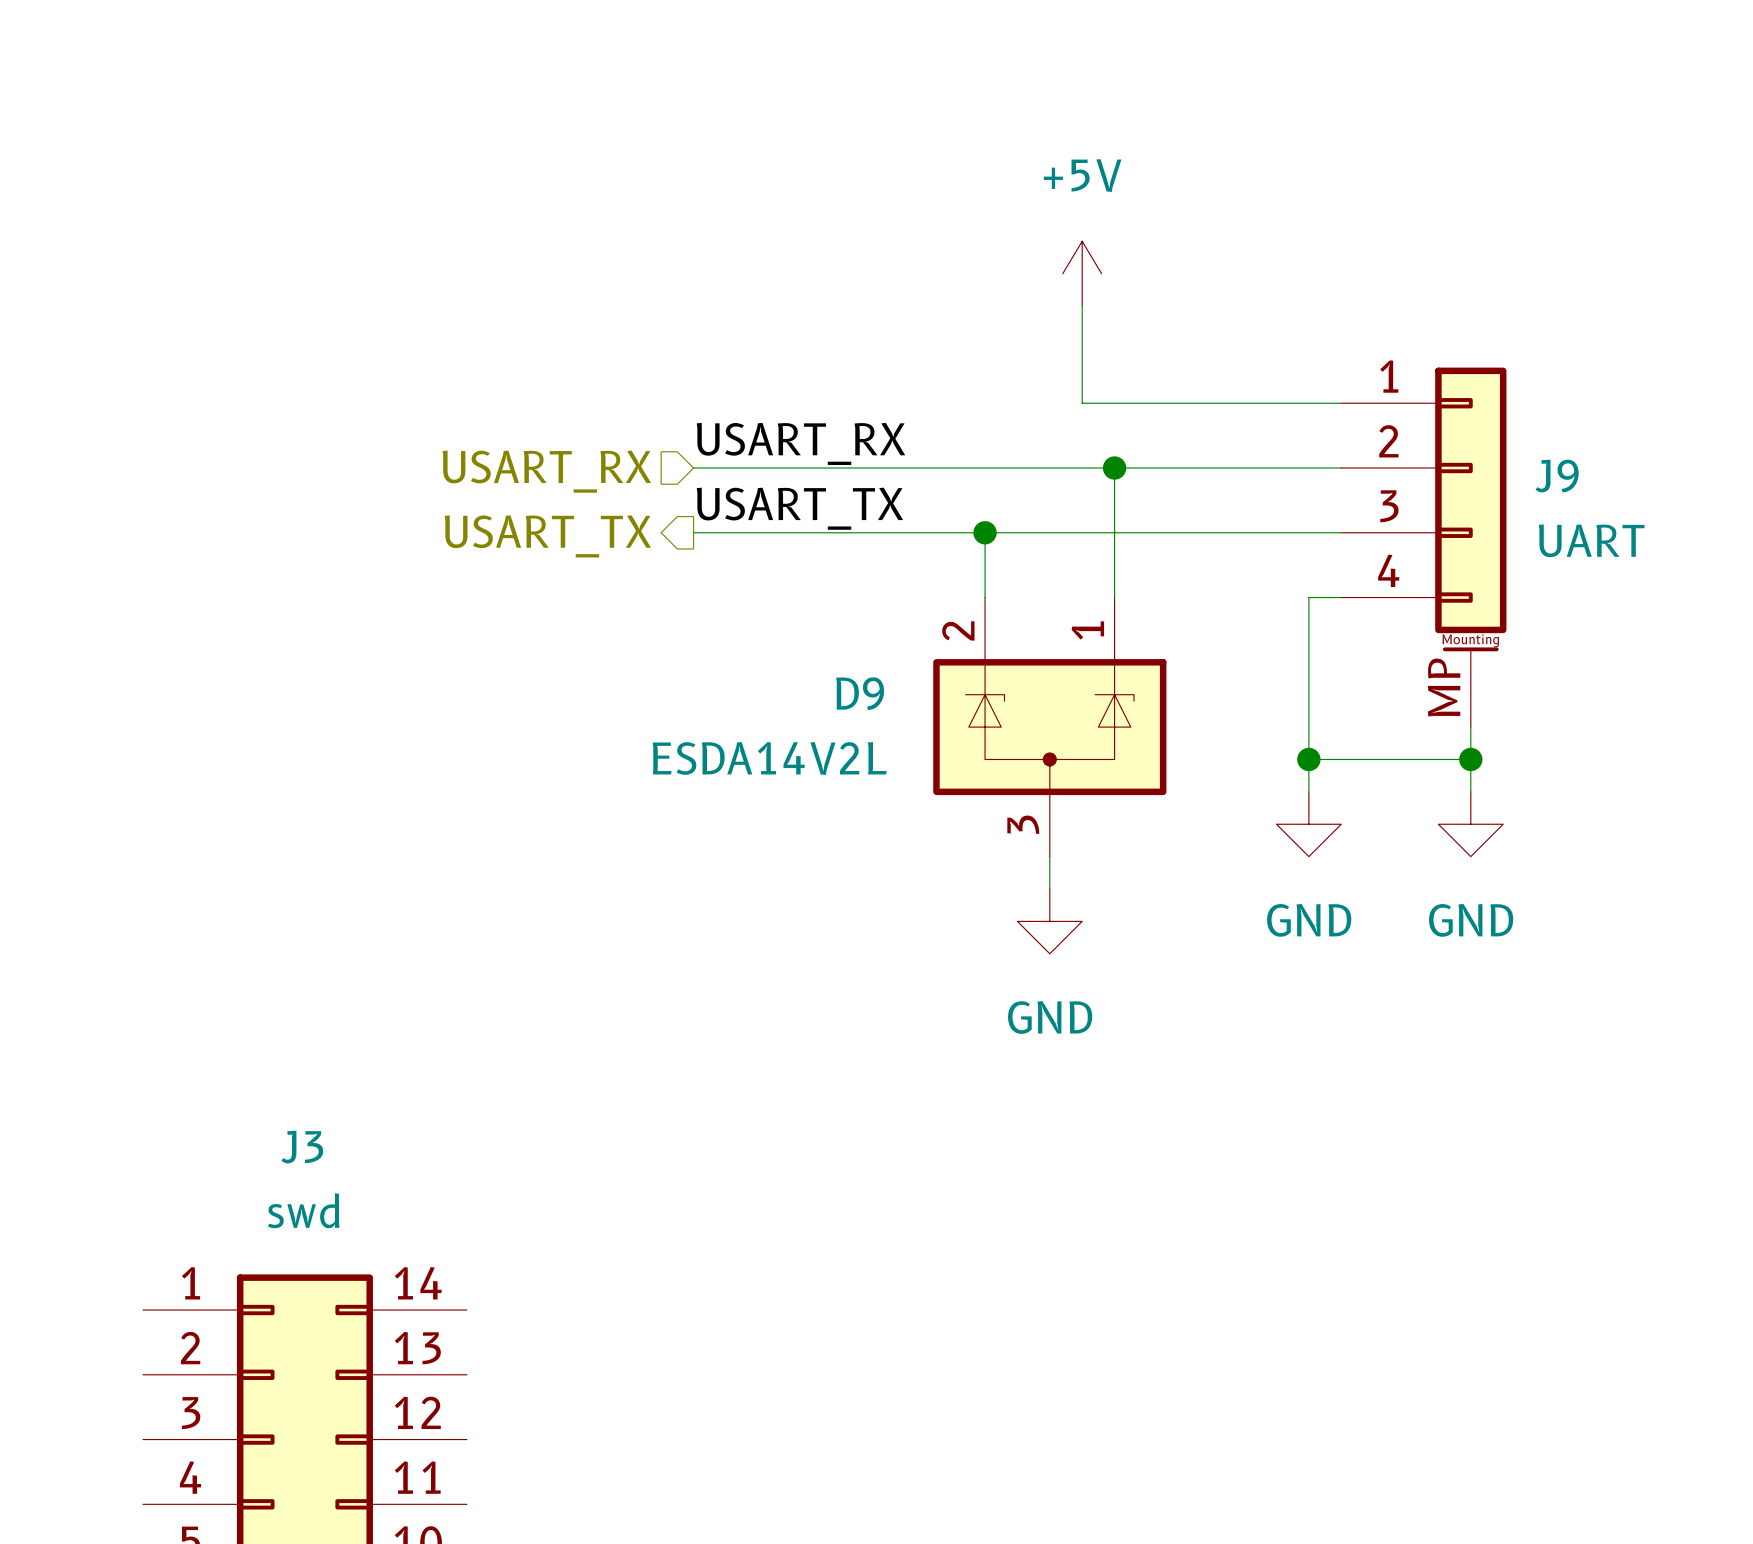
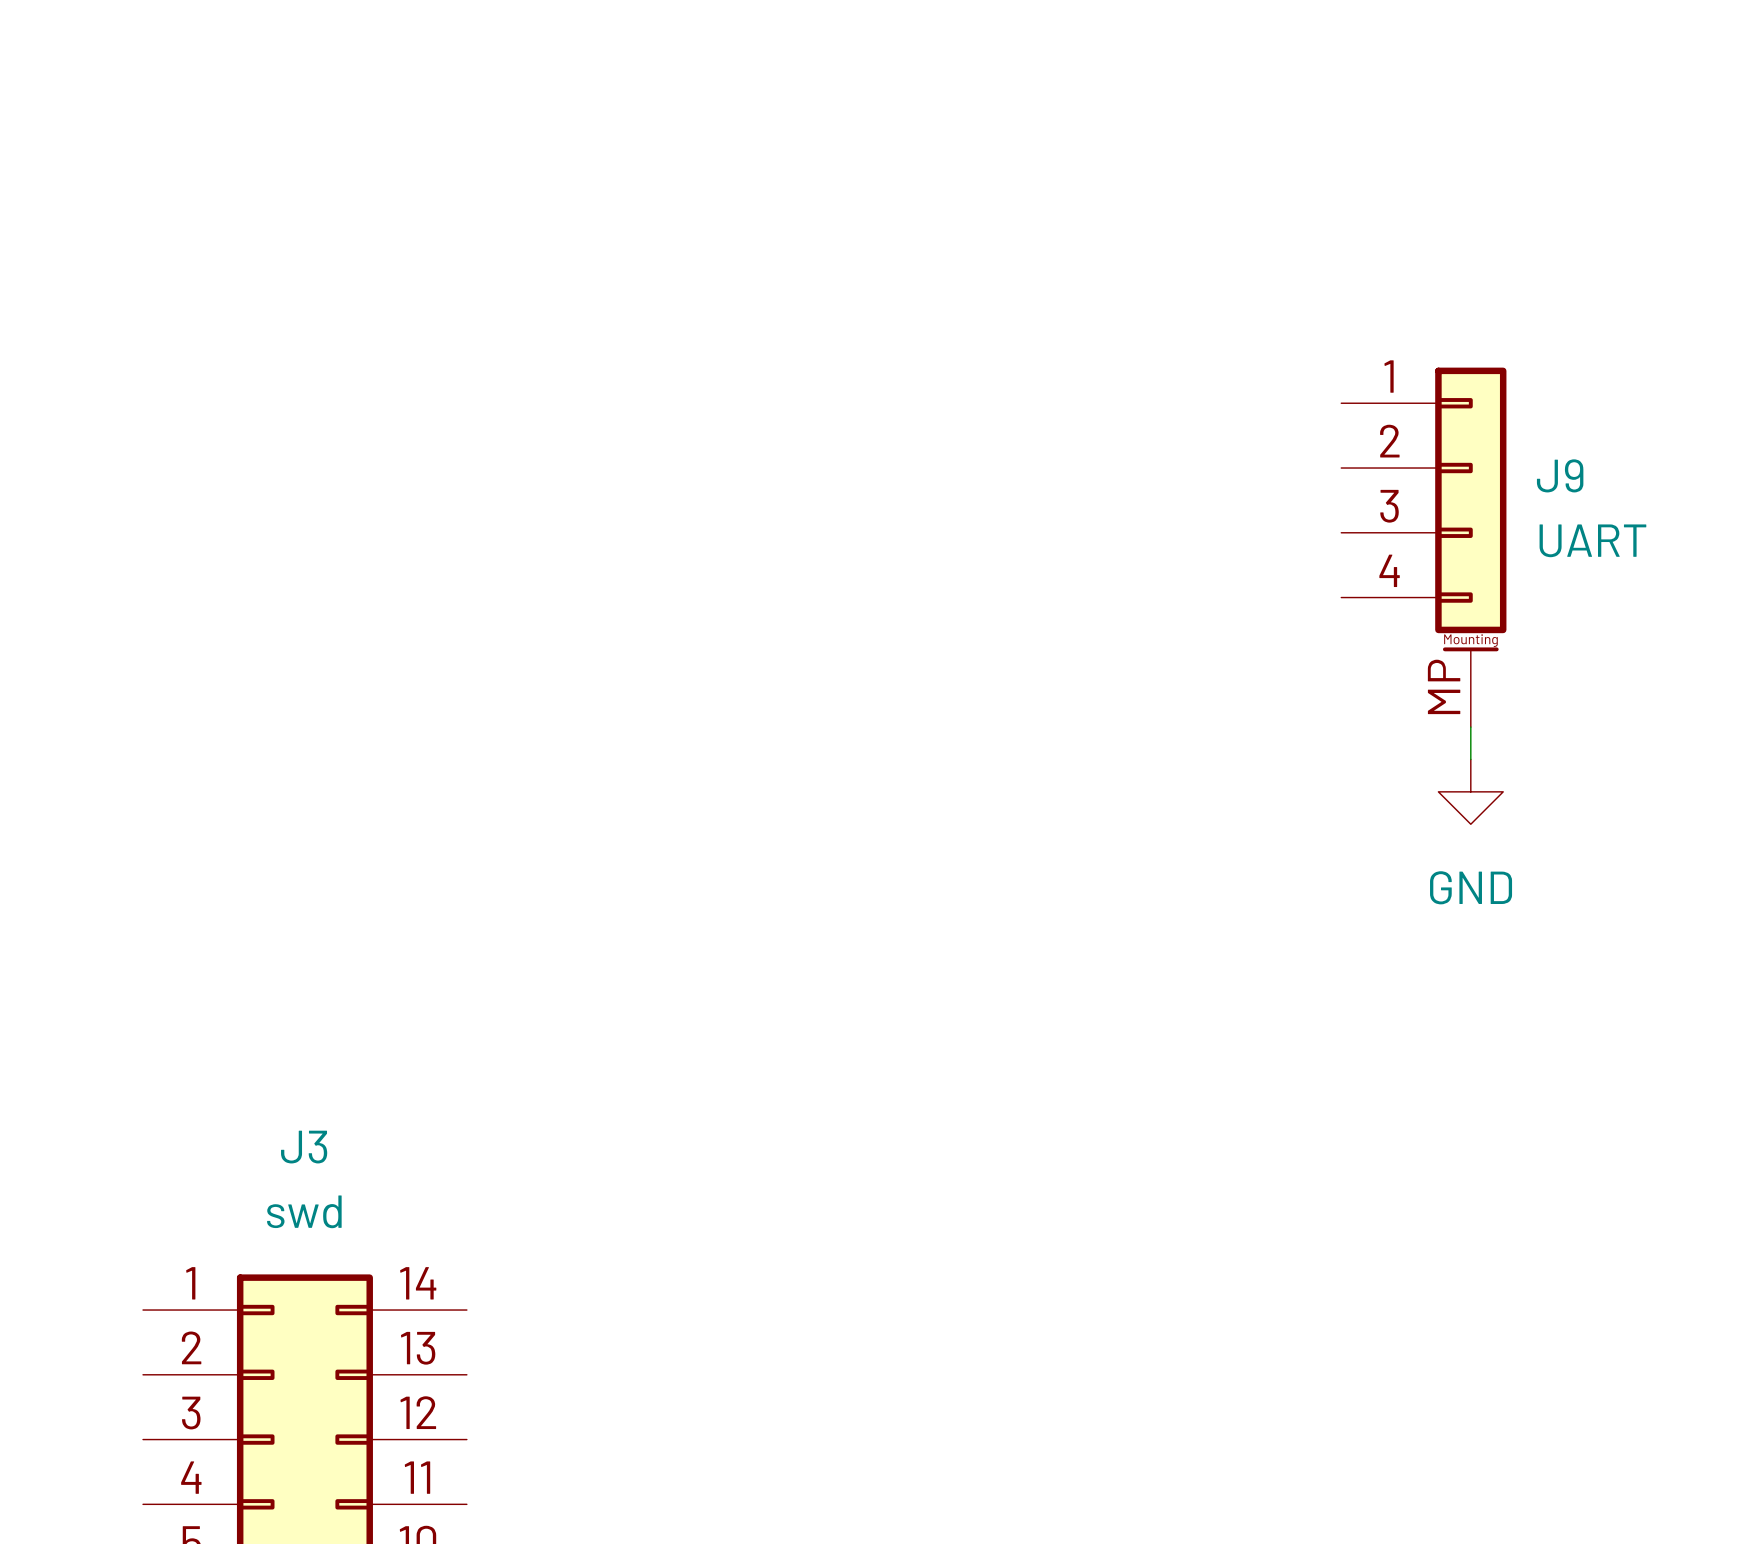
power symbol: +5V (1082, 273) -> none
wire: (1082, 306) (1082, 403) (1341, 403) -> none
label: USART_RX (800, 443) -> none
wire: (693, 468) (1341, 468) -> none
wire: (1114, 468) (1114, 597) -> none
junction: (1114, 468) -> none
hierarchical label: USART_RX (546, 471) -> none
label: USART_TX (799, 508) -> none
wire: (693, 532) (1341, 532) -> none
wire: (985, 532) (985, 597) -> none
junction: (985, 532) -> none
hierarchical label: USART_TX (547, 536) -> none
wire: (1341, 597) (1308, 597) (1308, 791) -> none
D9: ESDA14V2L (1049, 727) -> none
wire: (1308, 759) (1470, 759) (1470, 791) -> none
junction: (1308, 759) -> none
junction: (1470, 759) -> none
power symbol: GND (1308, 824) -> none
power symbol position: GND (1470, 824) -> GND (1470, 791)
wire: (1049, 856) (1049, 889) -> none
power symbol: GND (1049, 921) -> none

